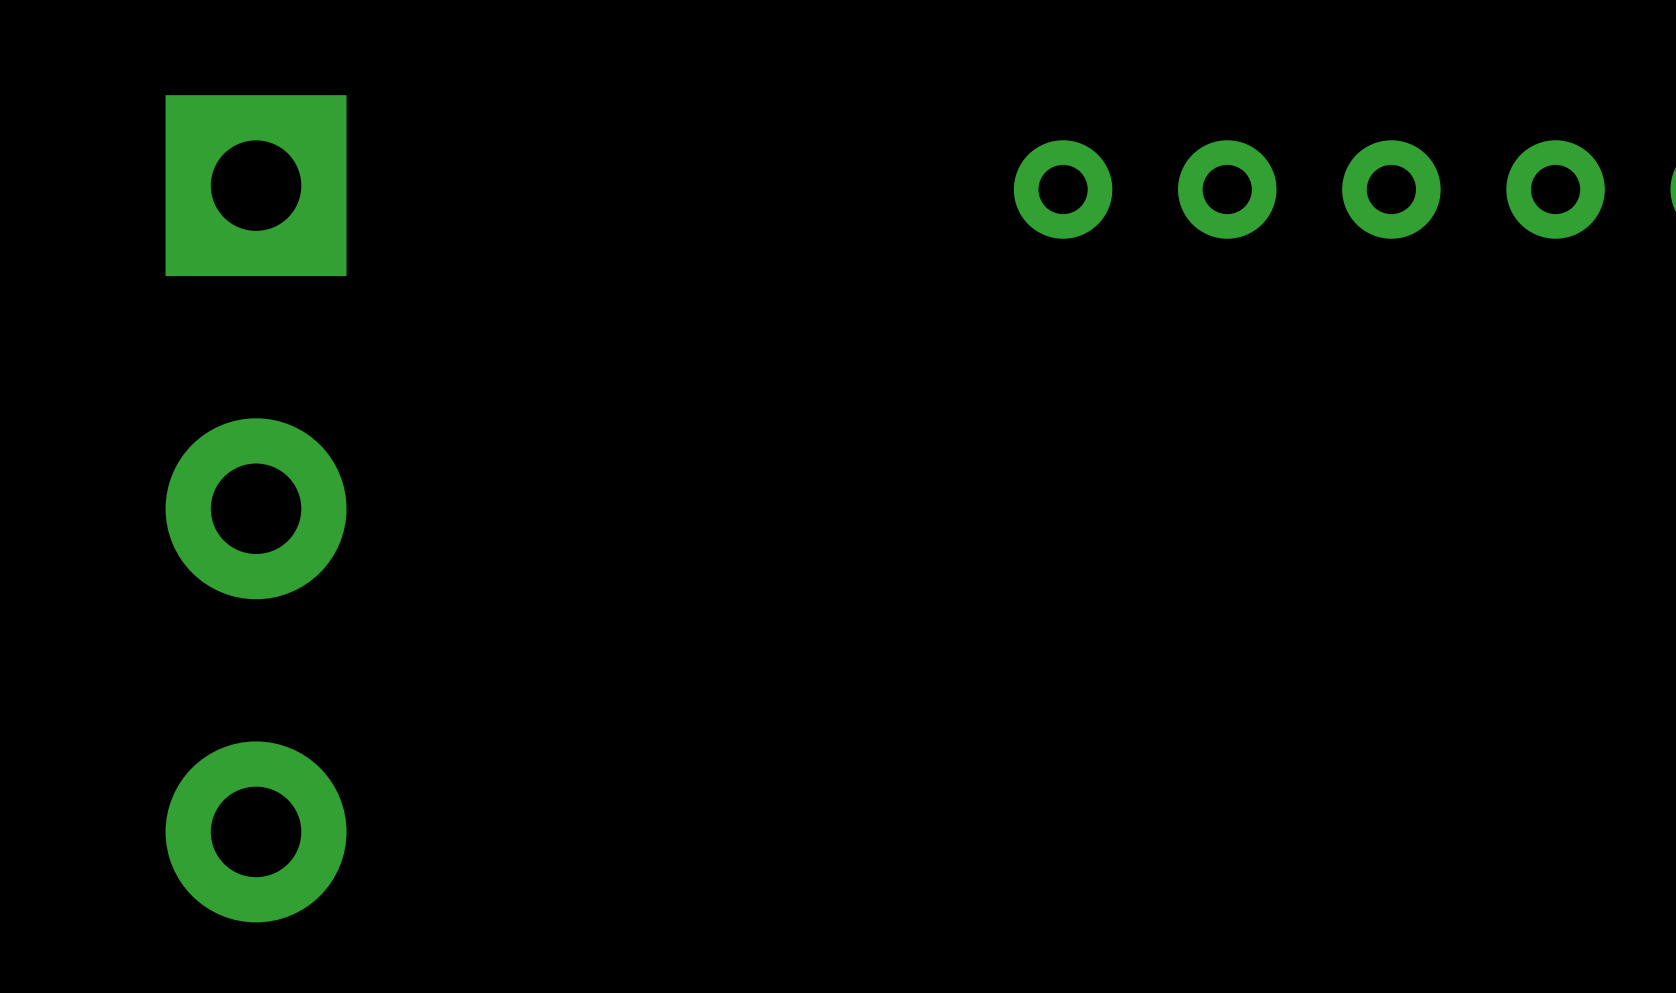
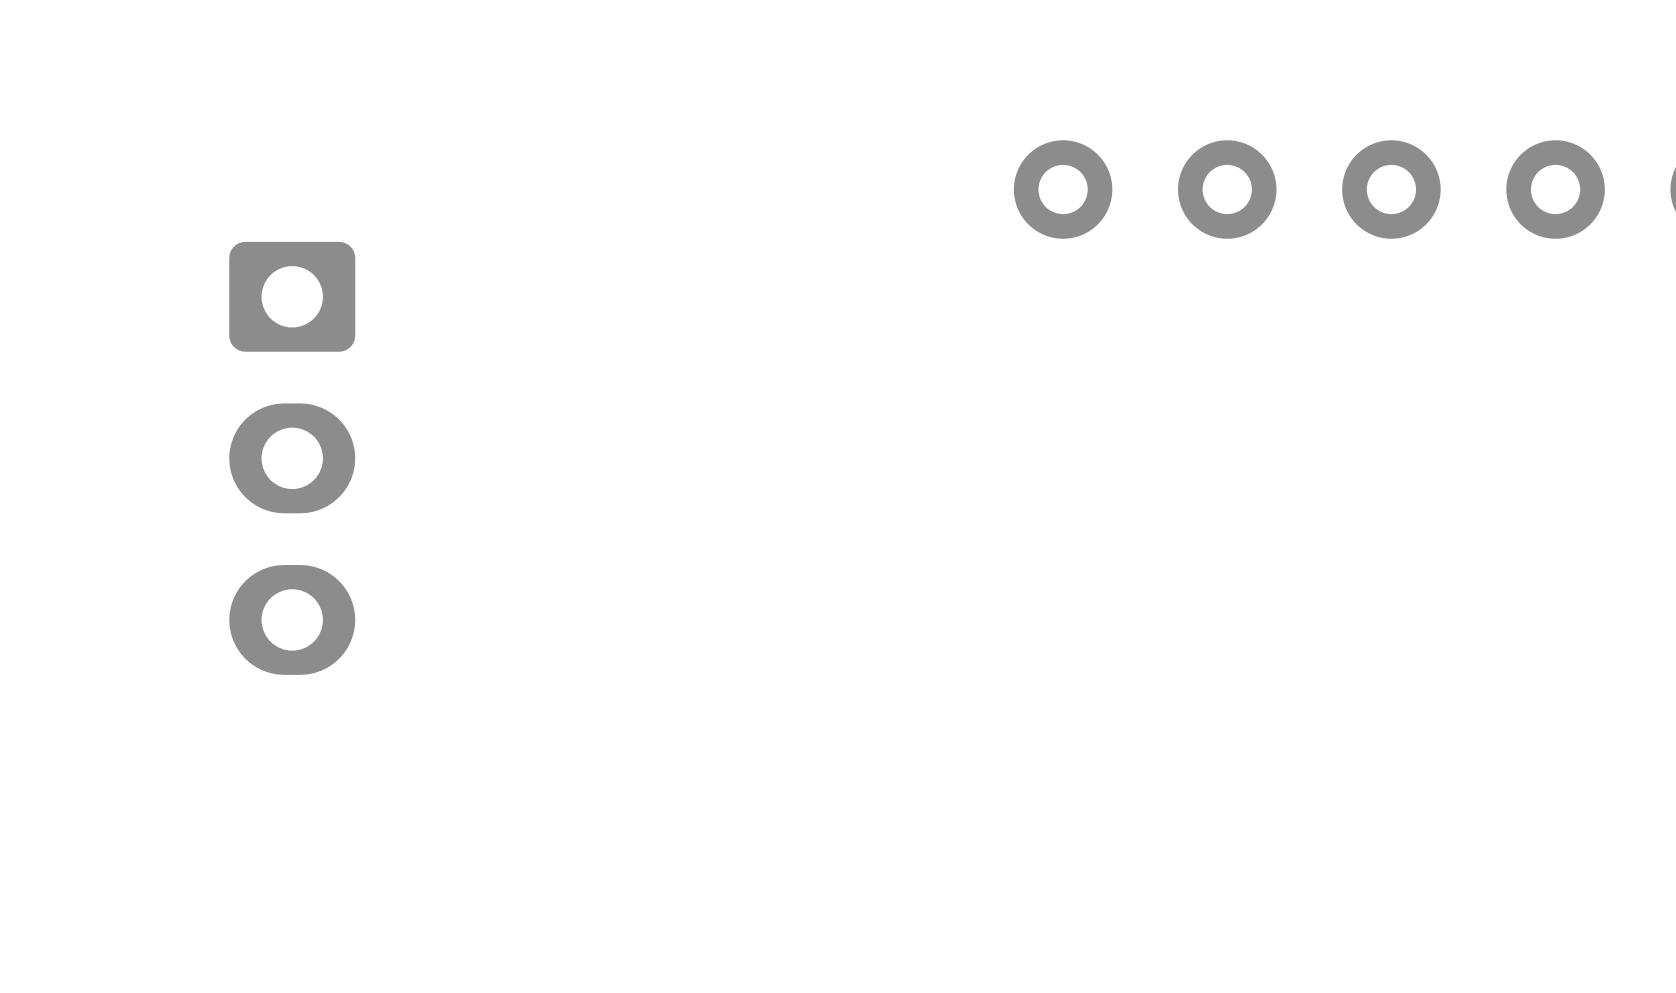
part footprint: [165, 95, 347, 923] -> [229, 241, 356, 675]

